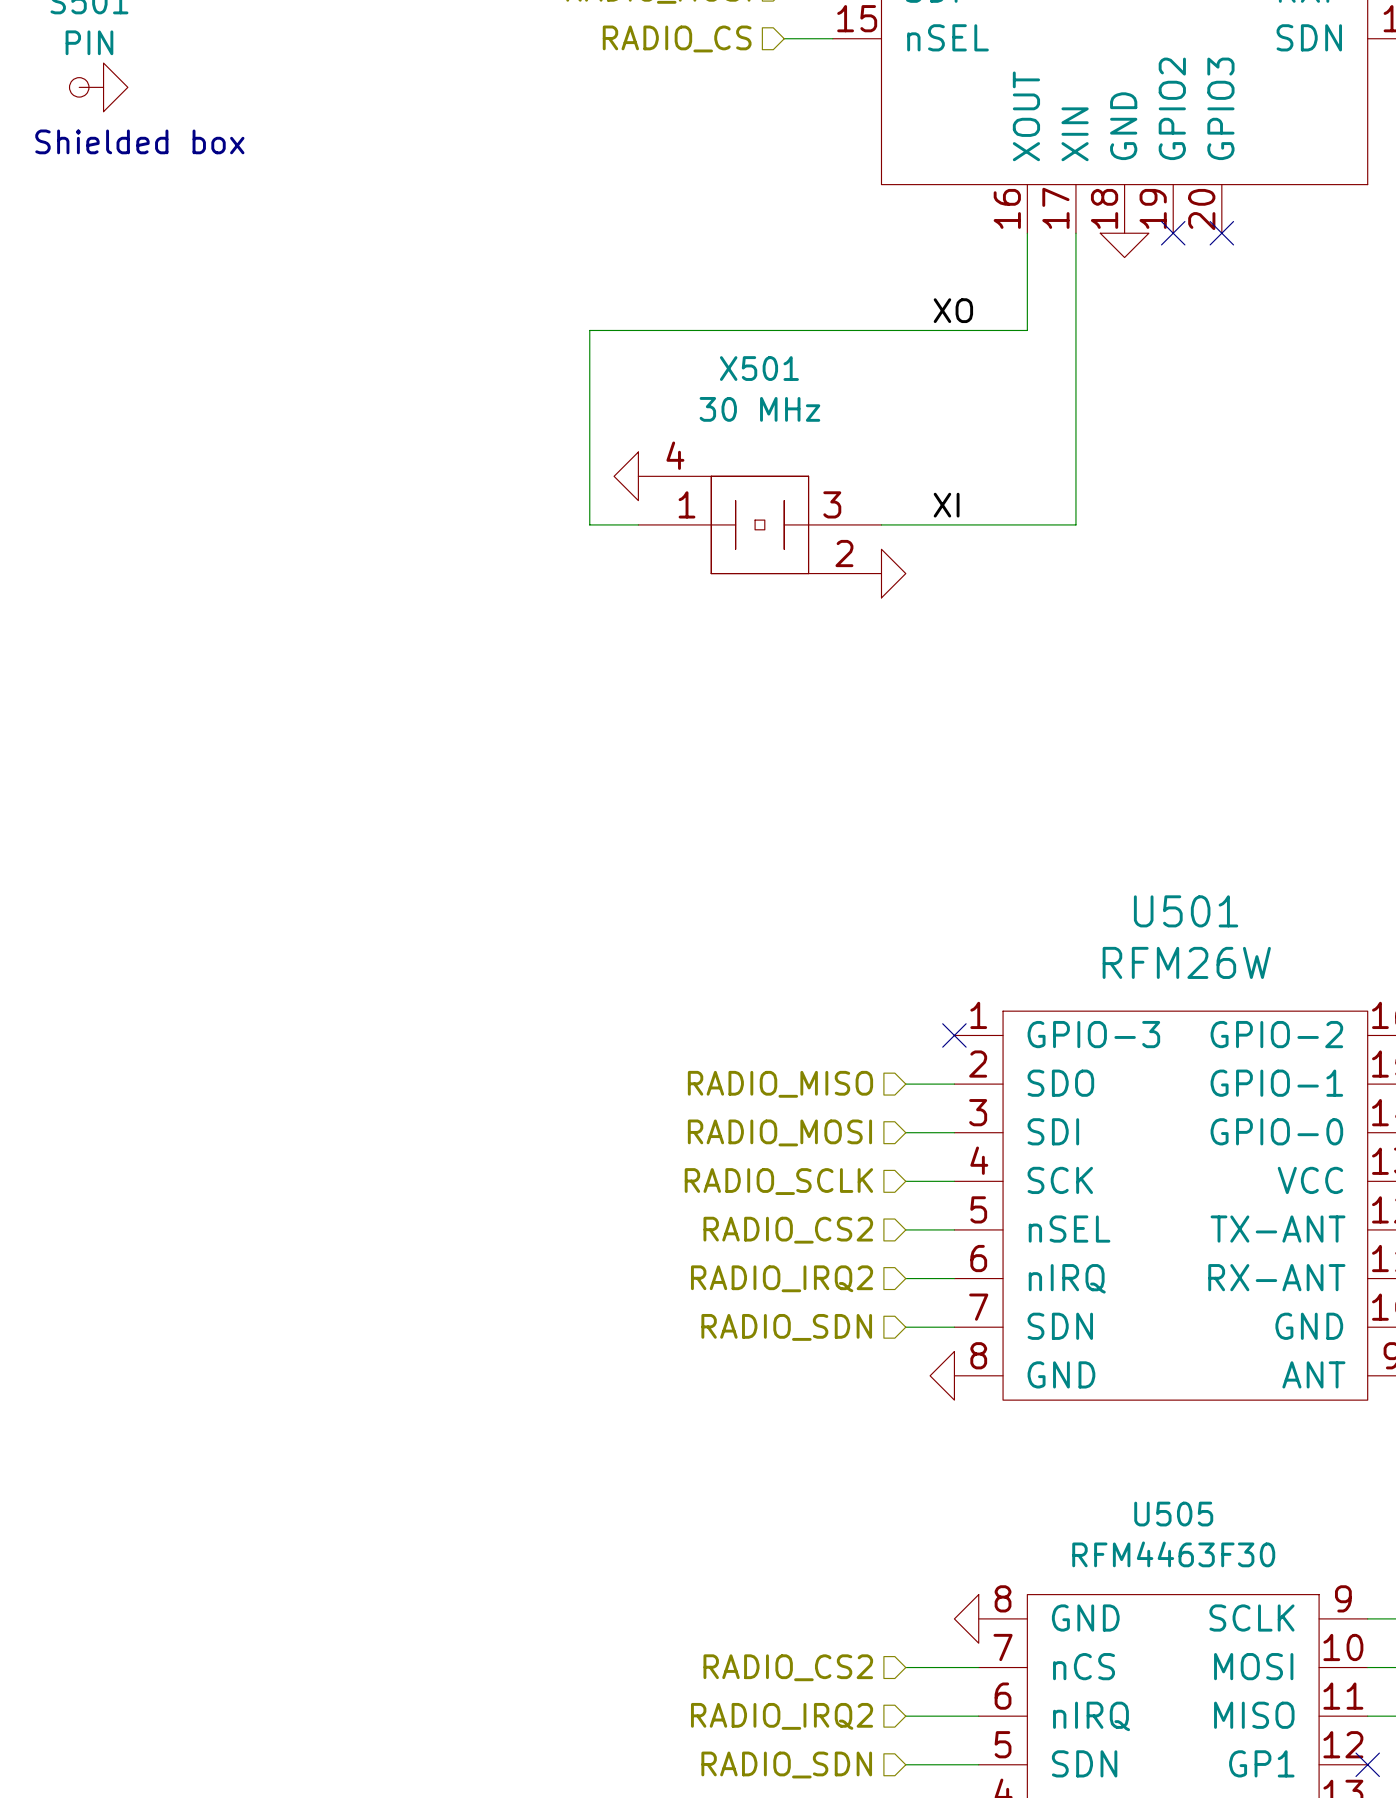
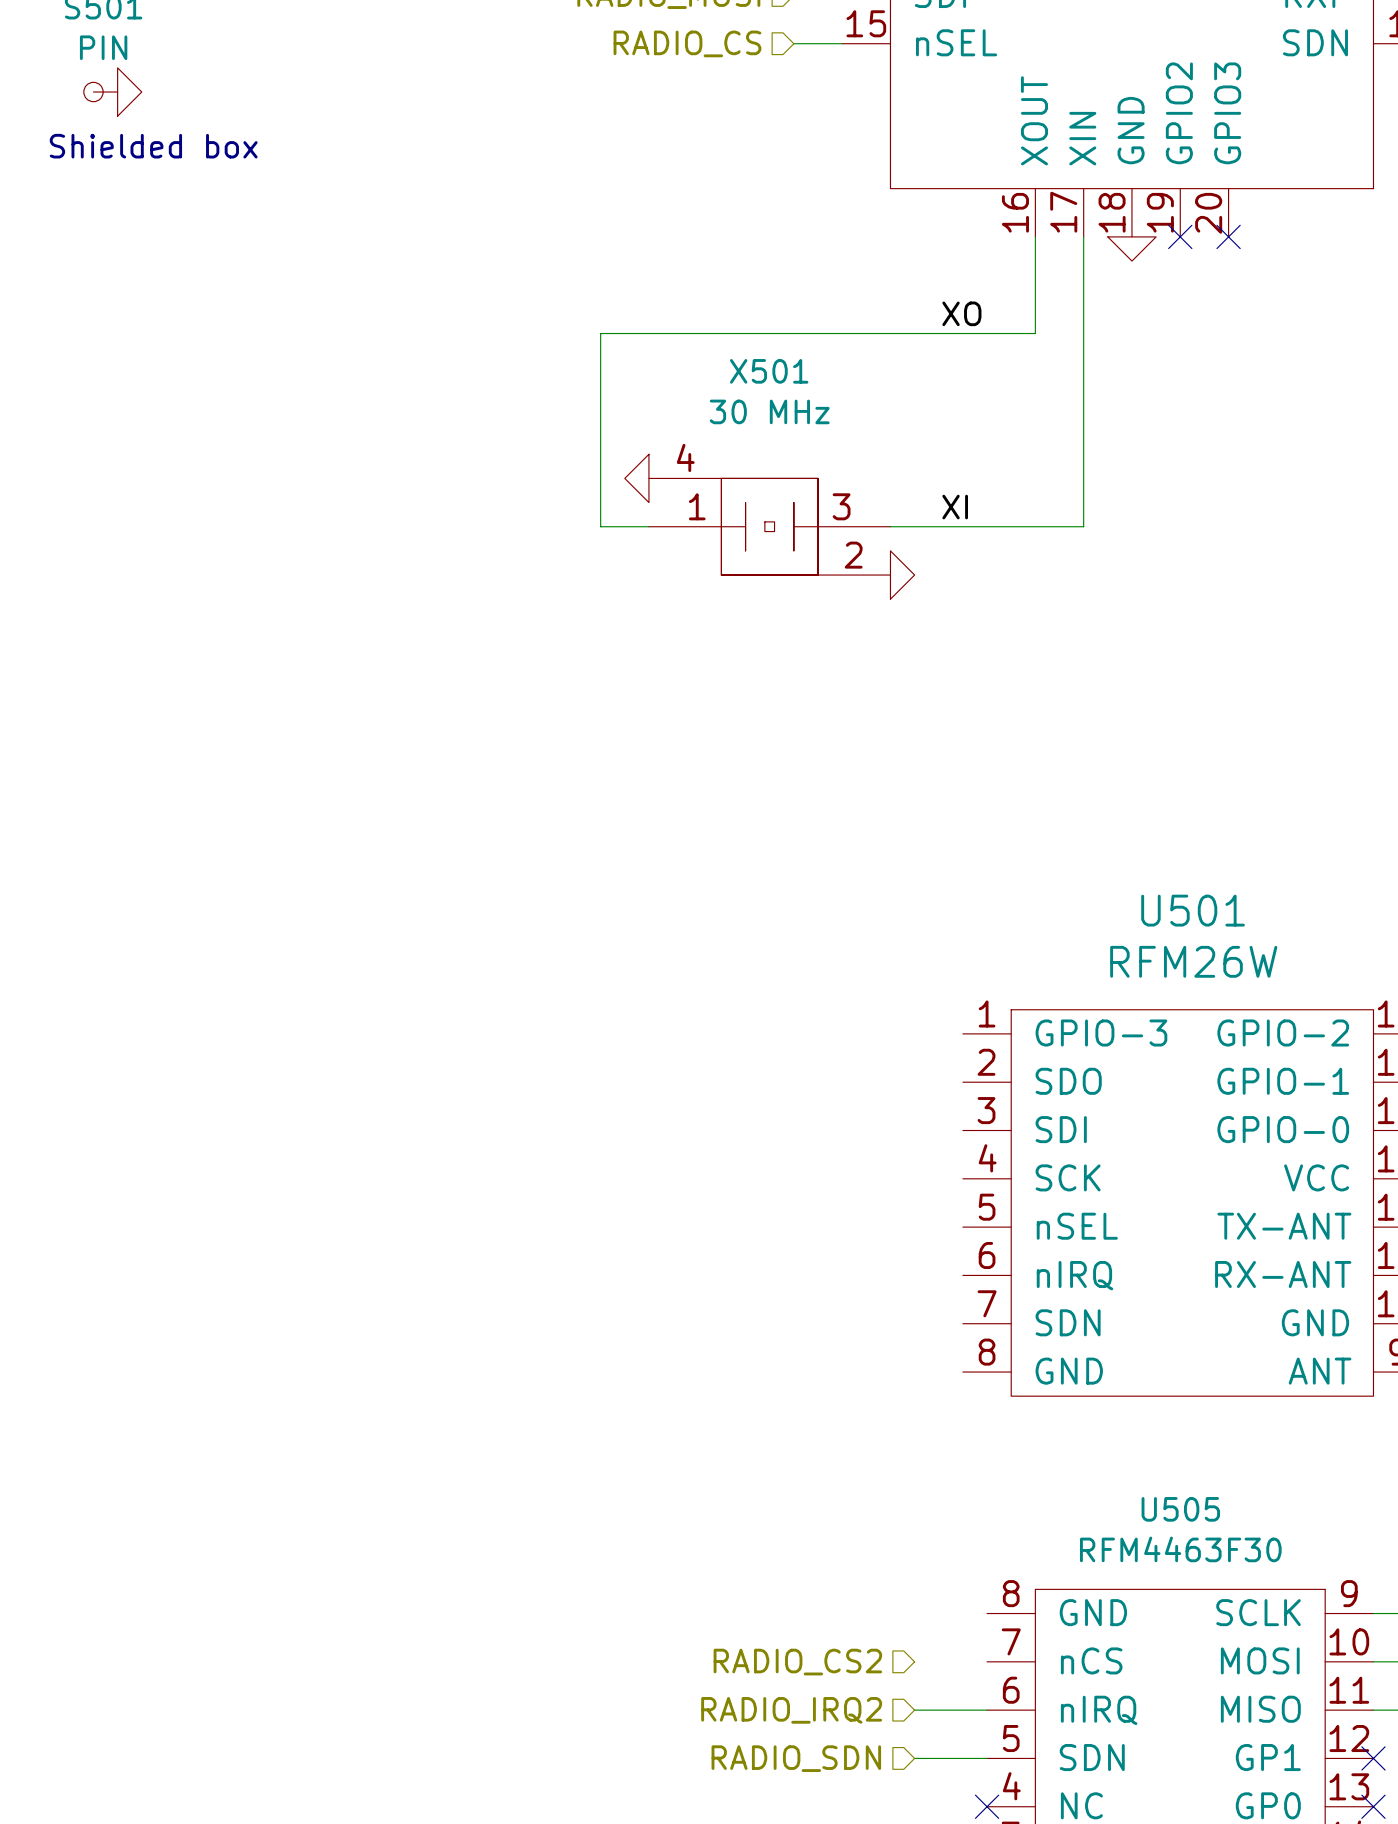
no-connect mark: (954, 1035) -> none
hierarchical label: RADIO_MISO (780, 1084) -> none
wire: (905, 1084) (954, 1084) -> none
hierarchical label: RADIO_MOSI (779, 1132) -> none
wire: (905, 1132) (954, 1132) -> none
hierarchical label: RADIO_SCLK (778, 1181) -> none
wire: (905, 1181) (954, 1181) -> none
wire: (905, 1229) (954, 1229) -> none
hierarchical label: RADIO_CS2 (788, 1230) -> none
hierarchical label: RADIO_IRQ2 (782, 1278) -> none
wire: (905, 1278) (954, 1278) -> none
hierarchical label: RADIO_SDN (786, 1327) -> none
wire: (905, 1327) (954, 1327) -> none
power symbol: (942, 1375) -> none
power symbol: (966, 1618) -> none
wire: (905, 1667) (978, 1667) -> none

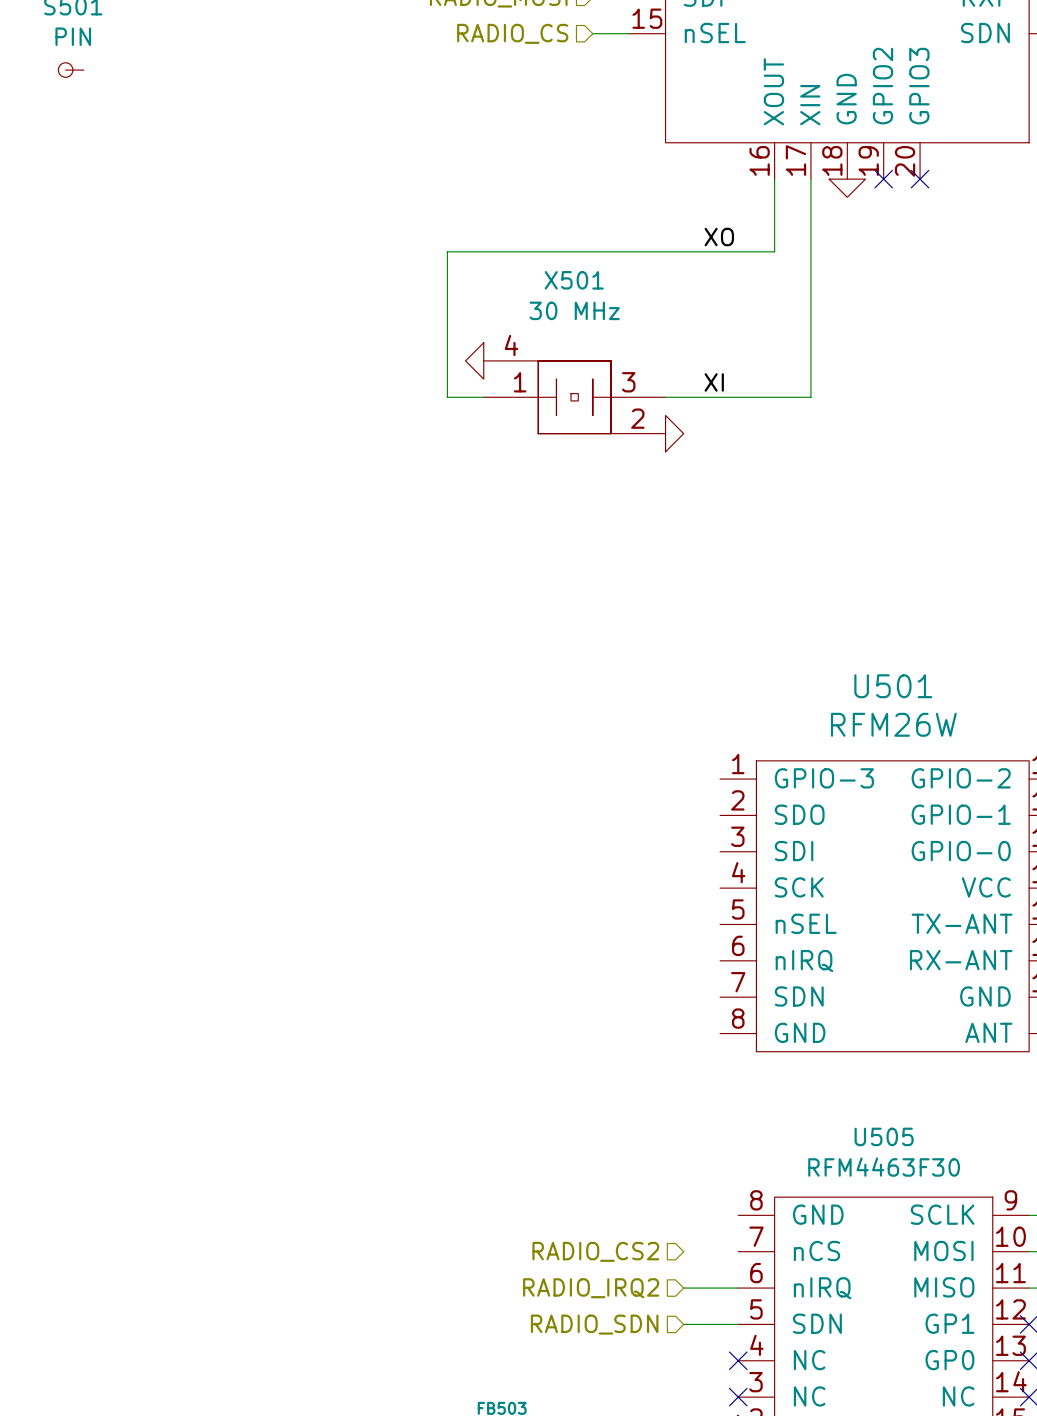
power symbol: (129, 92) -> none
text: Shielded box (153, 146) -> none

